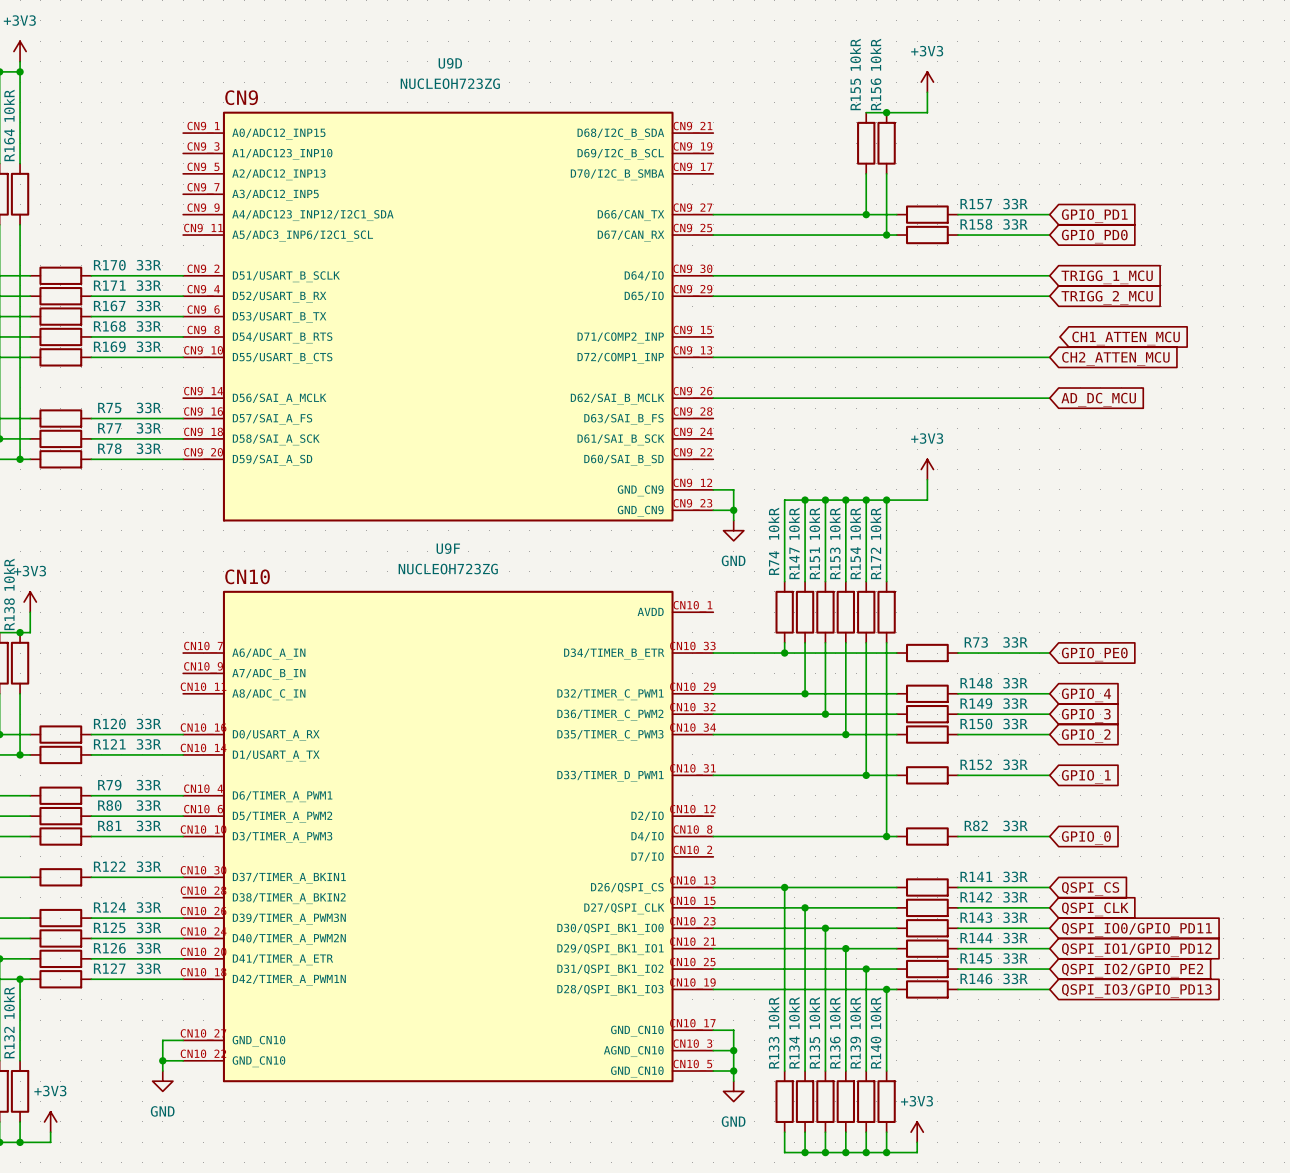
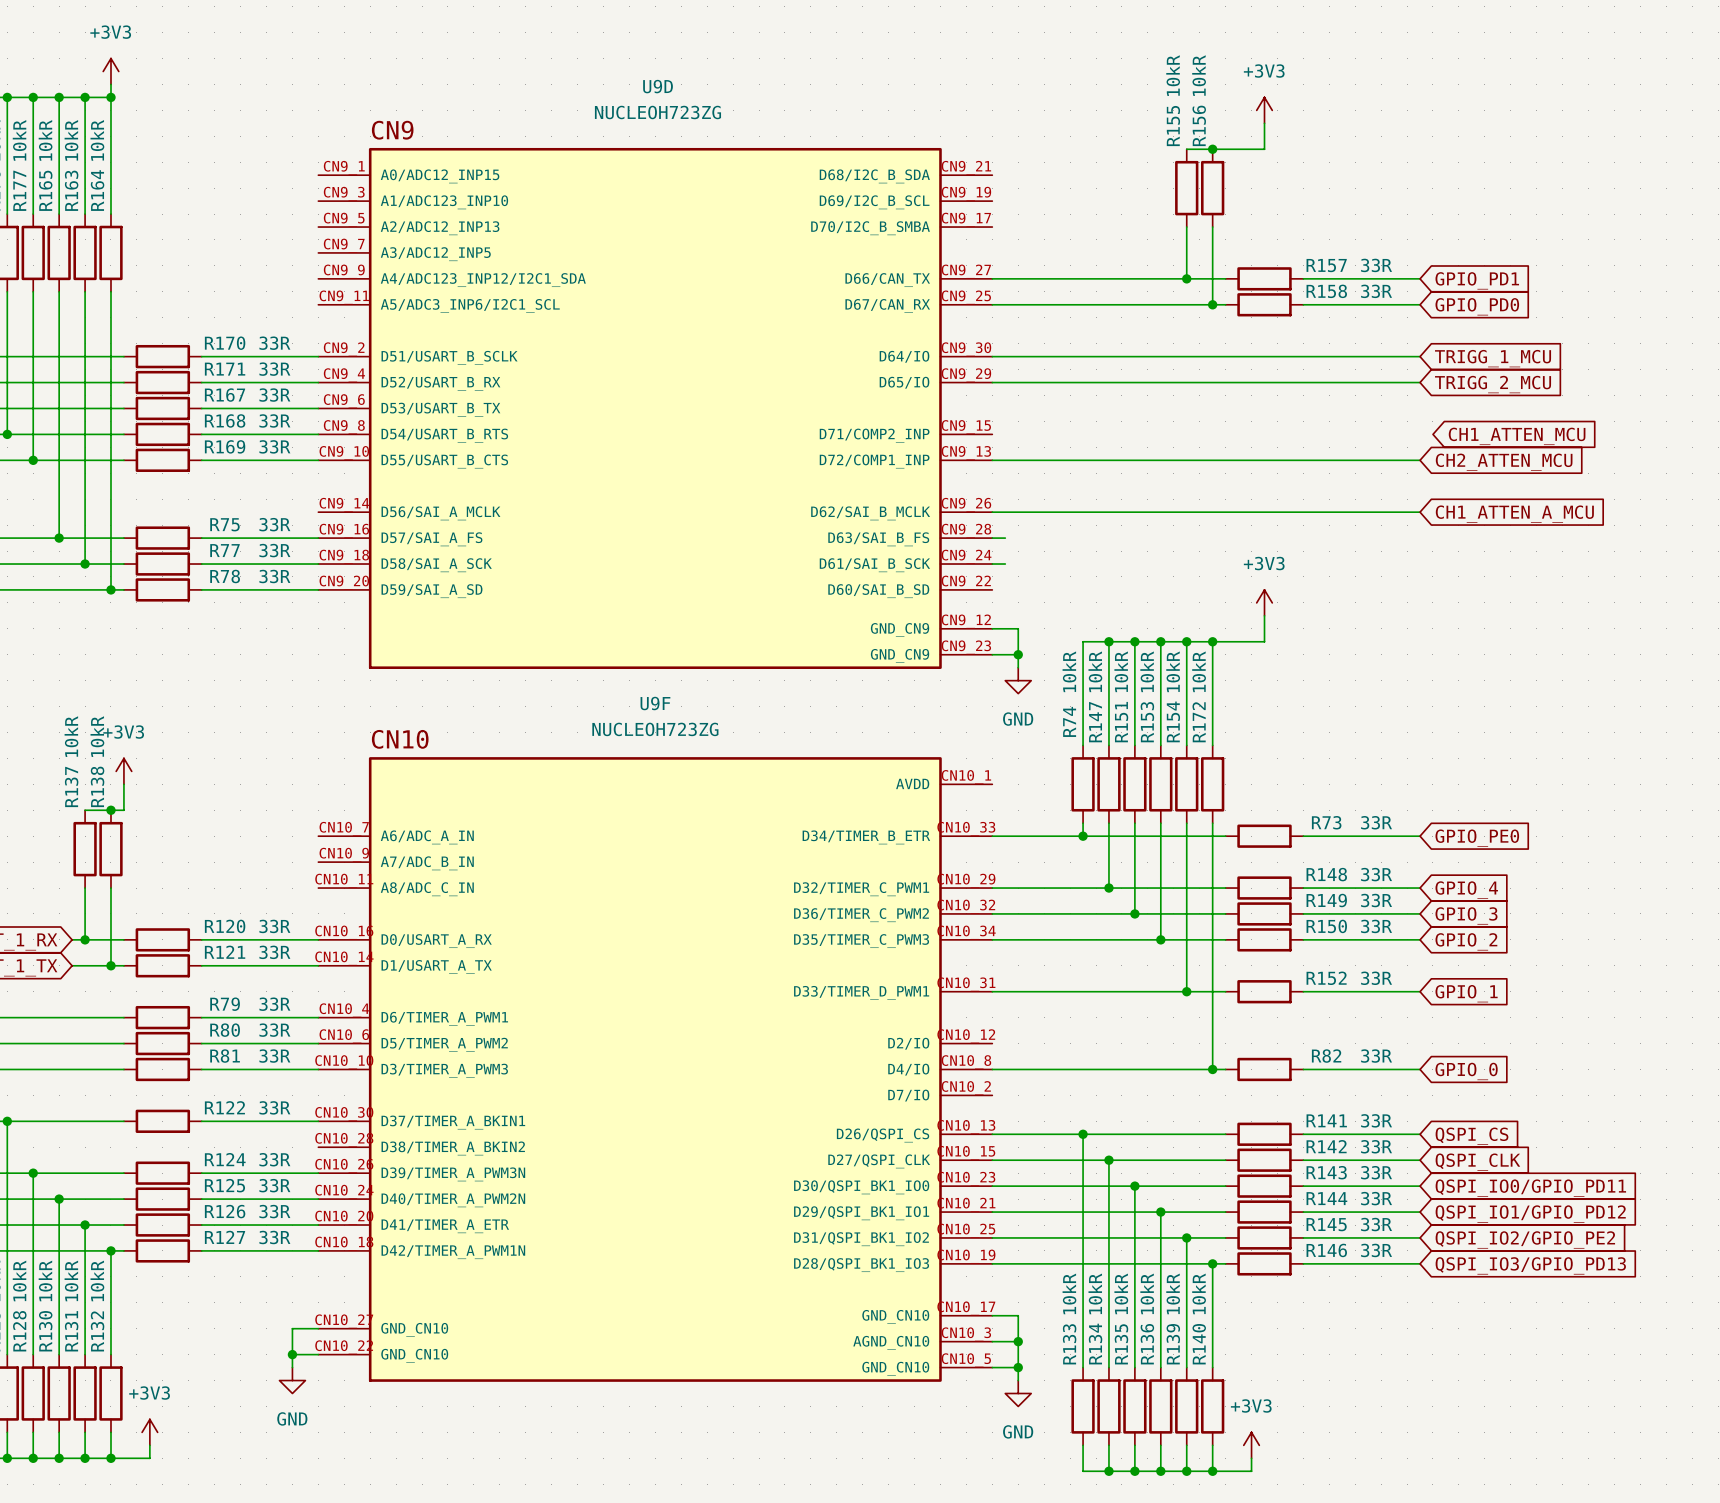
global label: AD_DC_MCU (1098, 399) -> CH1_ATTEN_A_MCU (1514, 514)
wire: none -> (992, 538) (1005, 538)
wire: none -> (992, 564) (1005, 564)

